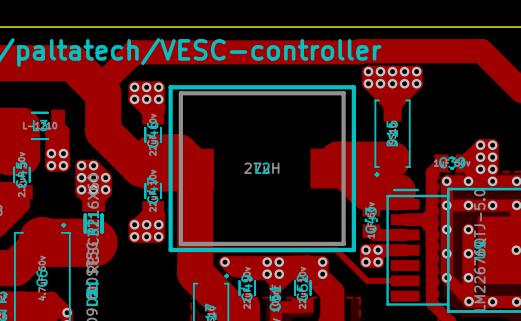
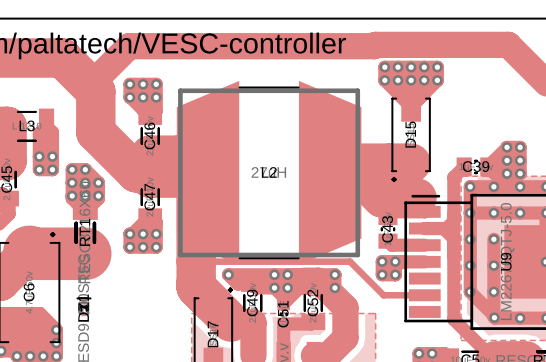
L2 footprint: [168, 85, 356, 253] -> [176, 80, 362, 265]

